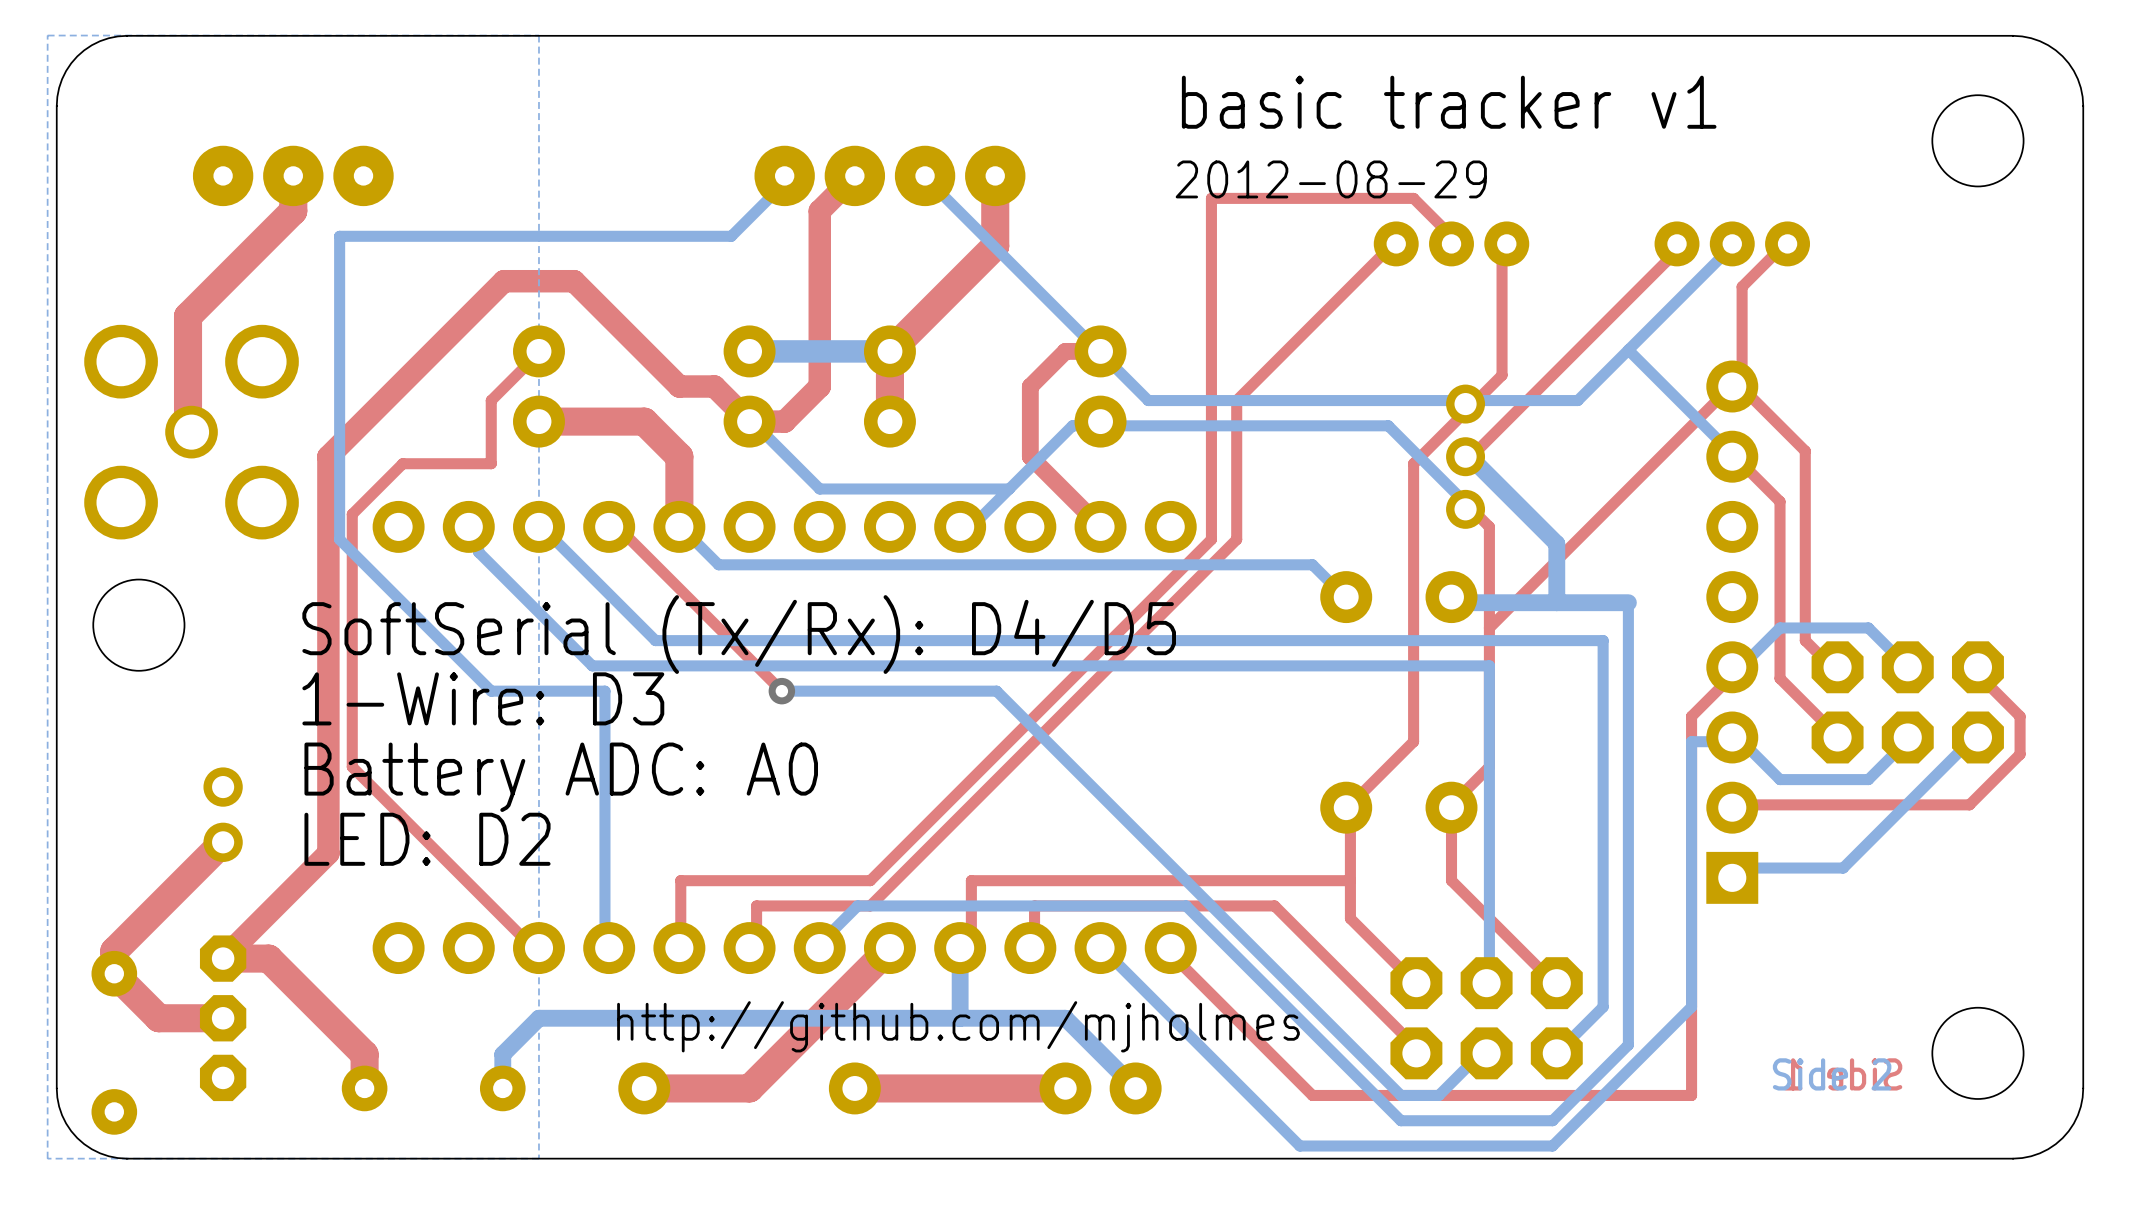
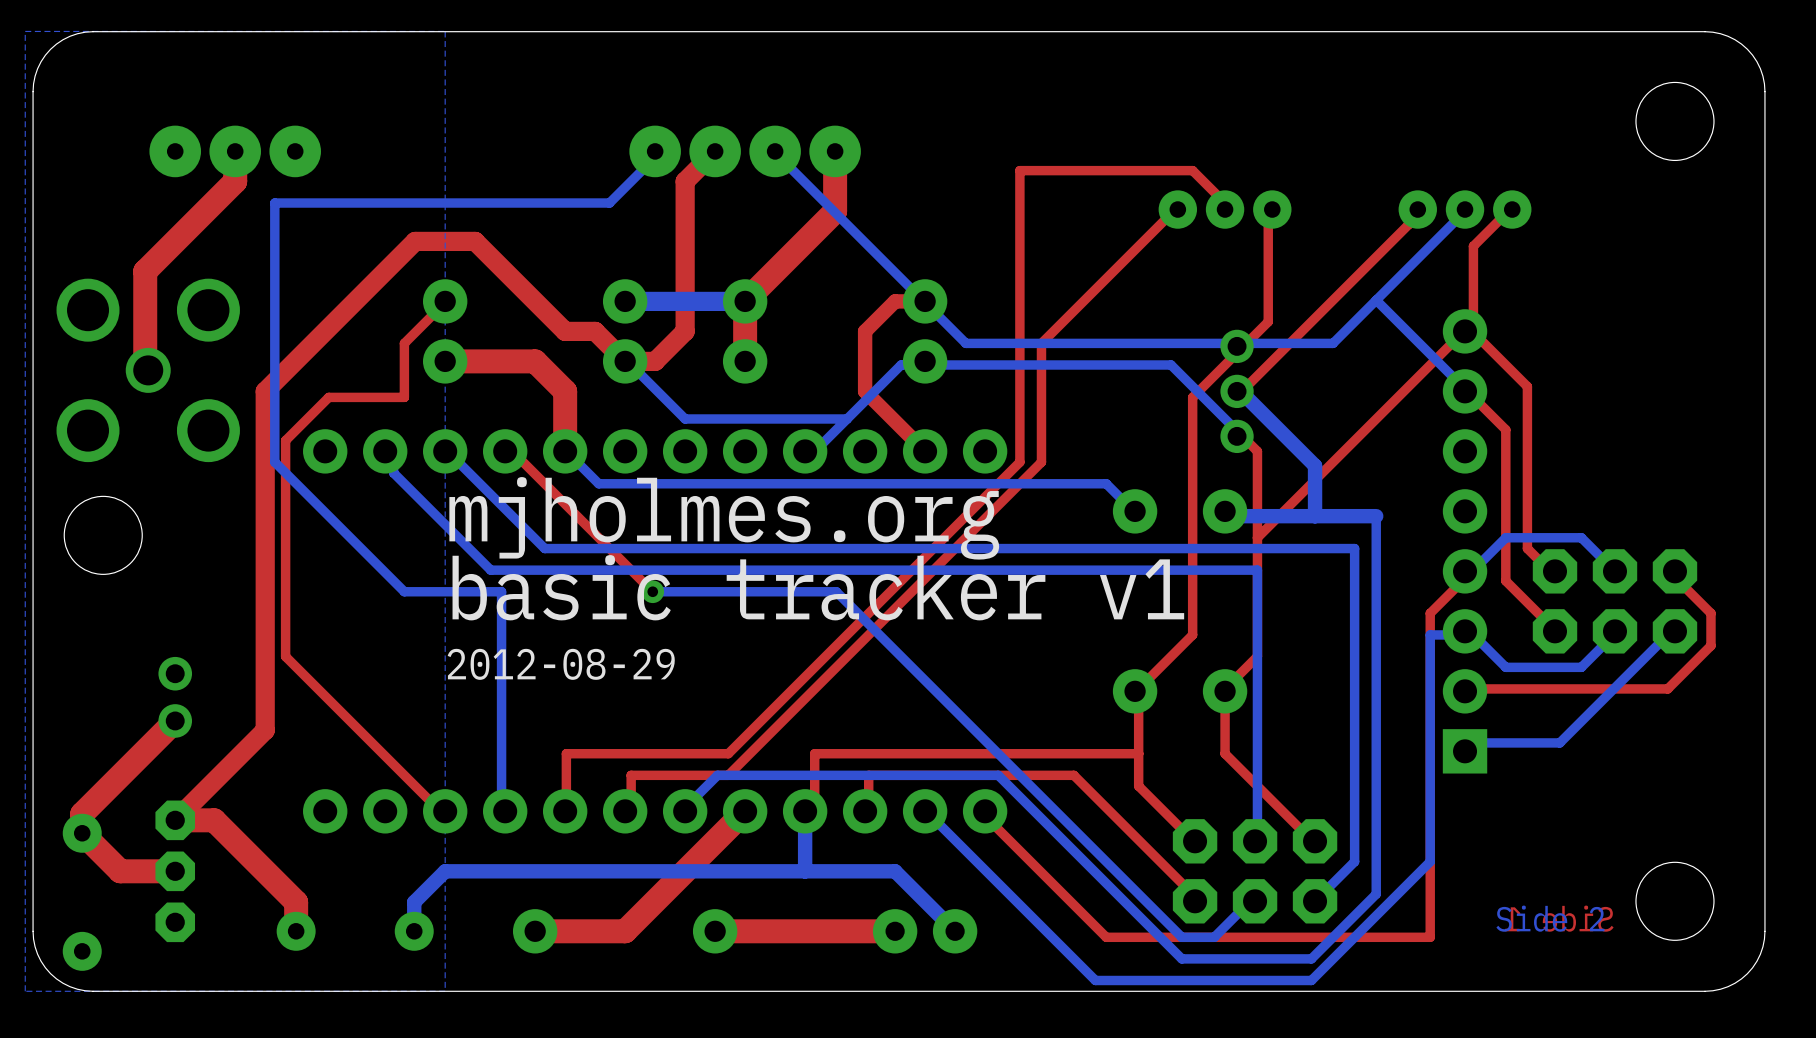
text: basic tracker v1 (1449, 102) -> none
text: 2012-08-29 (1331, 179) -> none
text: none -> mjholmes.org (724, 518)
text: SoftSerial (Tx/Rx): D4/D5 (739, 634) -> none
text: none -> basic tracker v1 (818, 587)
text: 1-Wire: D3 (483, 698) -> none
text: none -> 2012-08-29 (561, 664)
text: Battery ADC: A0 (561, 777) -> none
text: LED: D2 (427, 839) -> none
text: http://github.com/mjholmes (958, 1026) -> none

